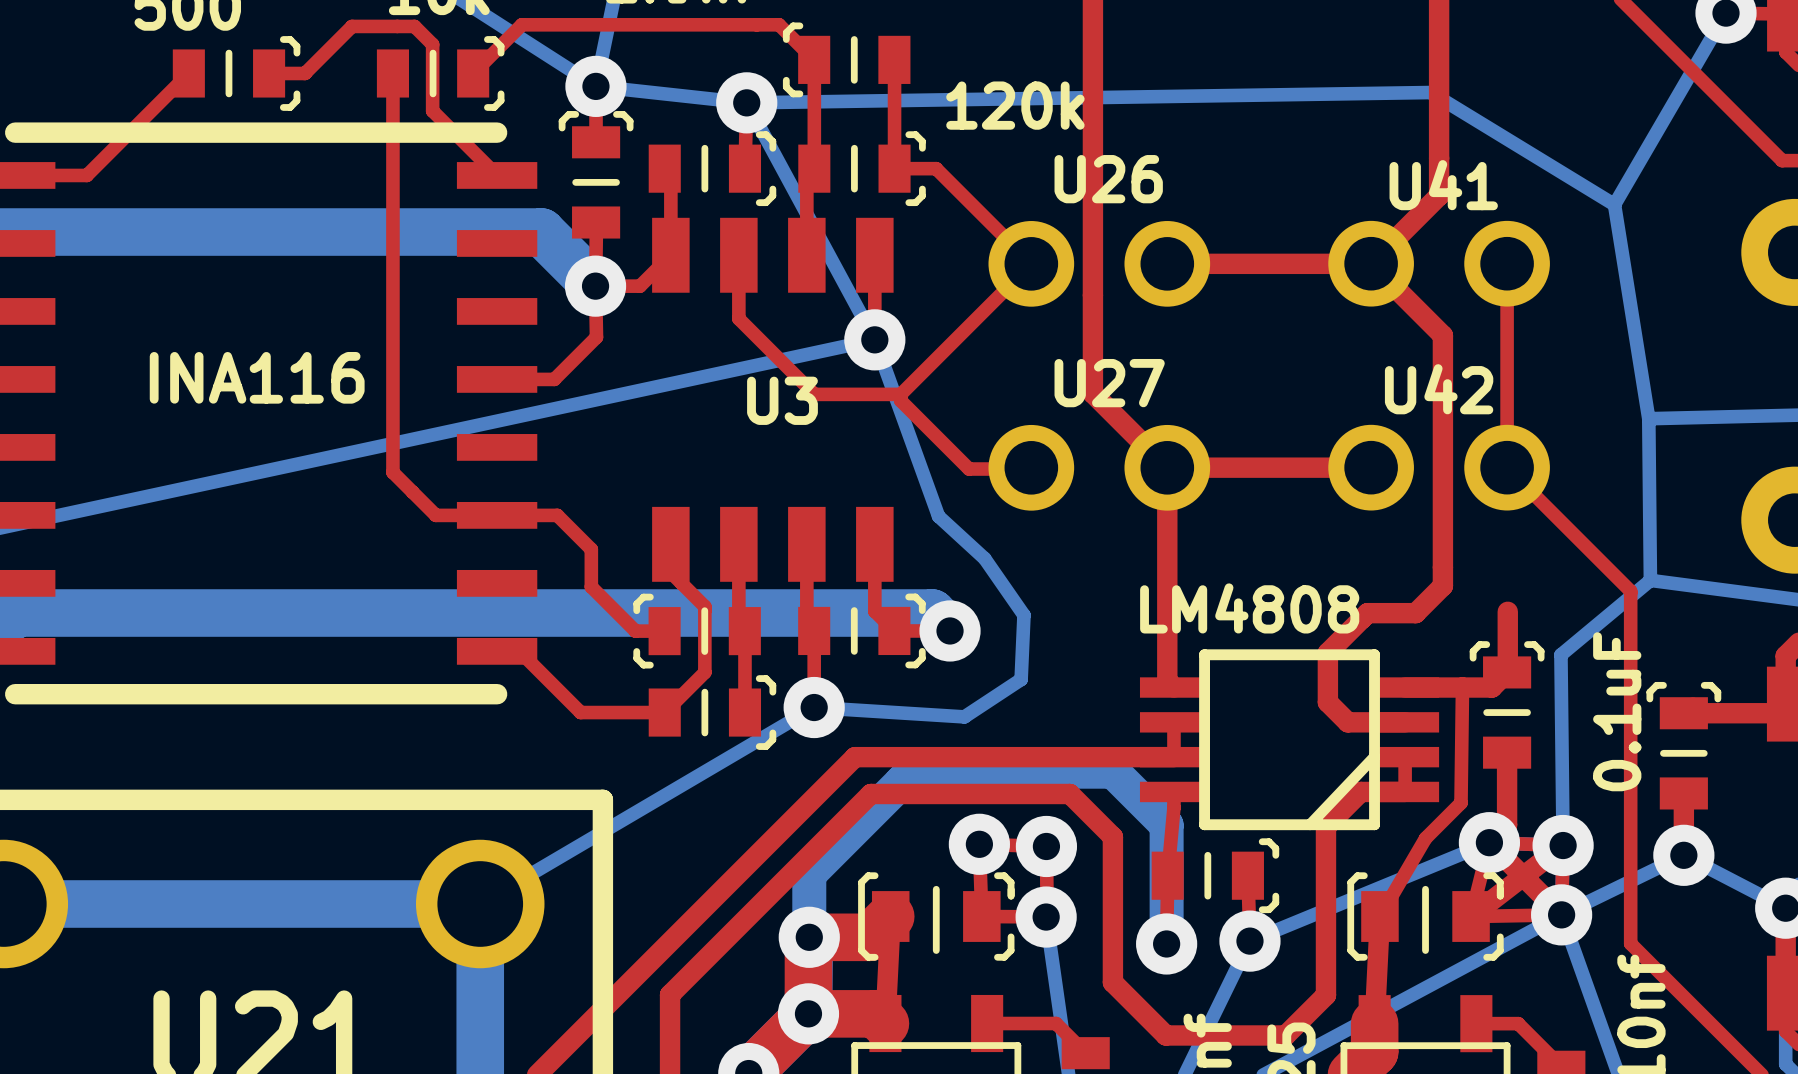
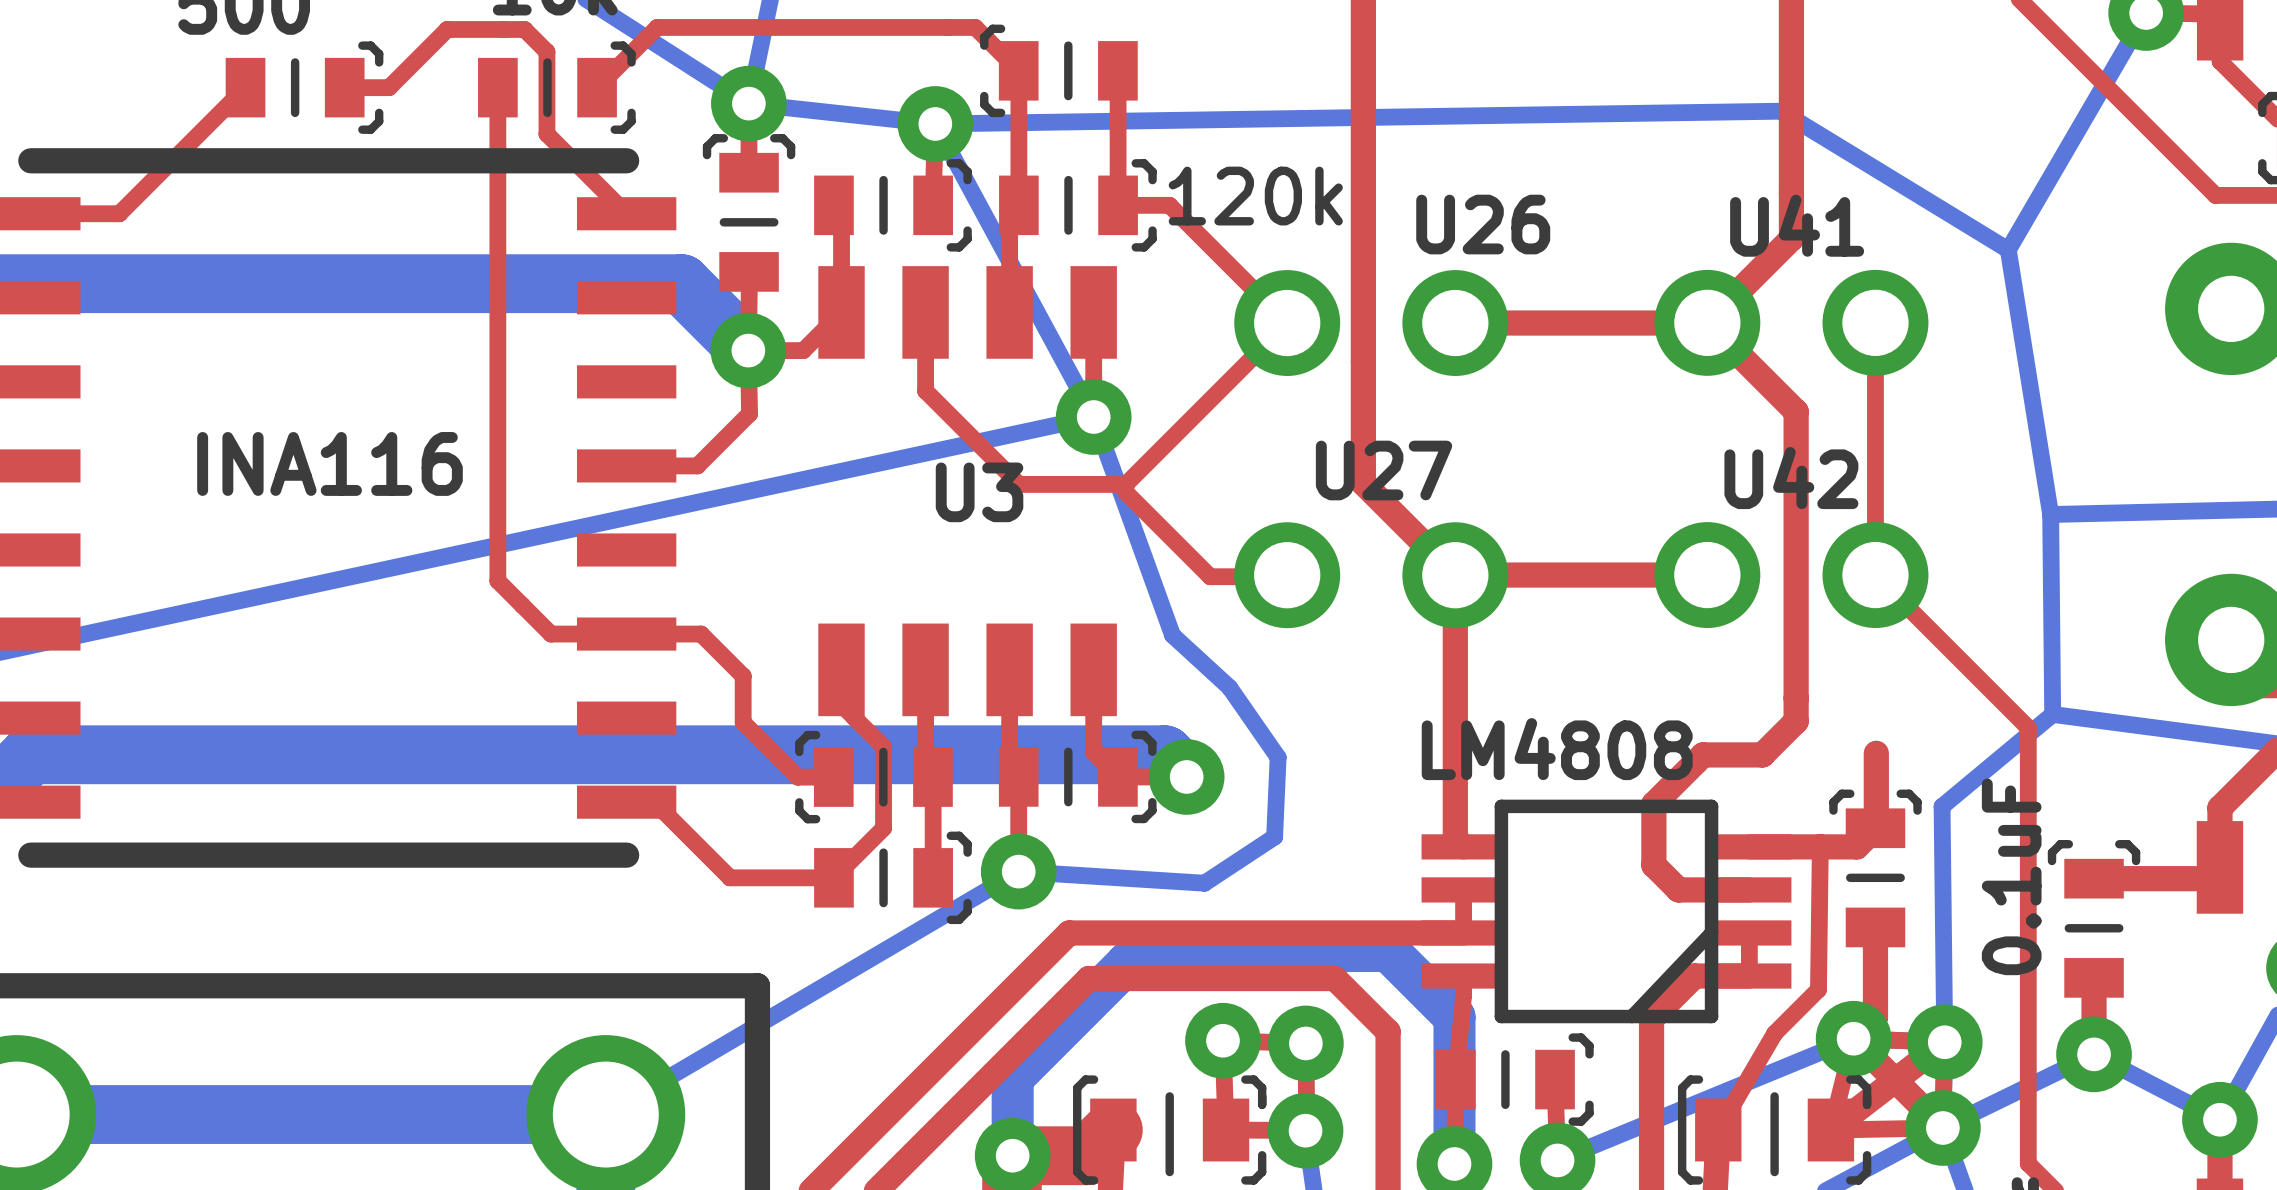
part value position: 120k (1015, 105) -> 120k (1255, 196)
U26 name position: U26 (1108, 179) -> U26 (1483, 224)

